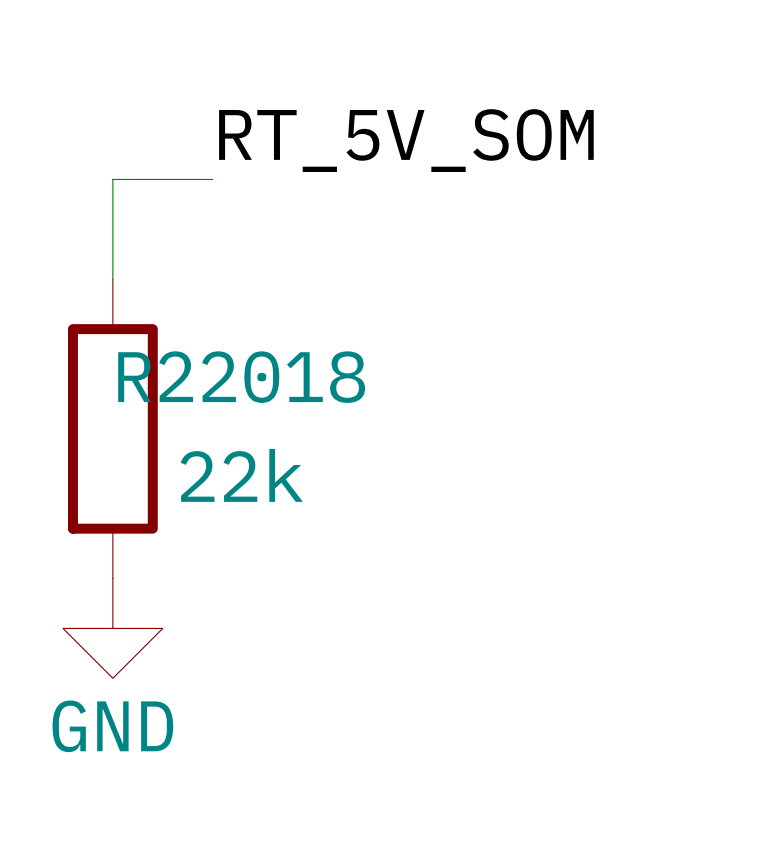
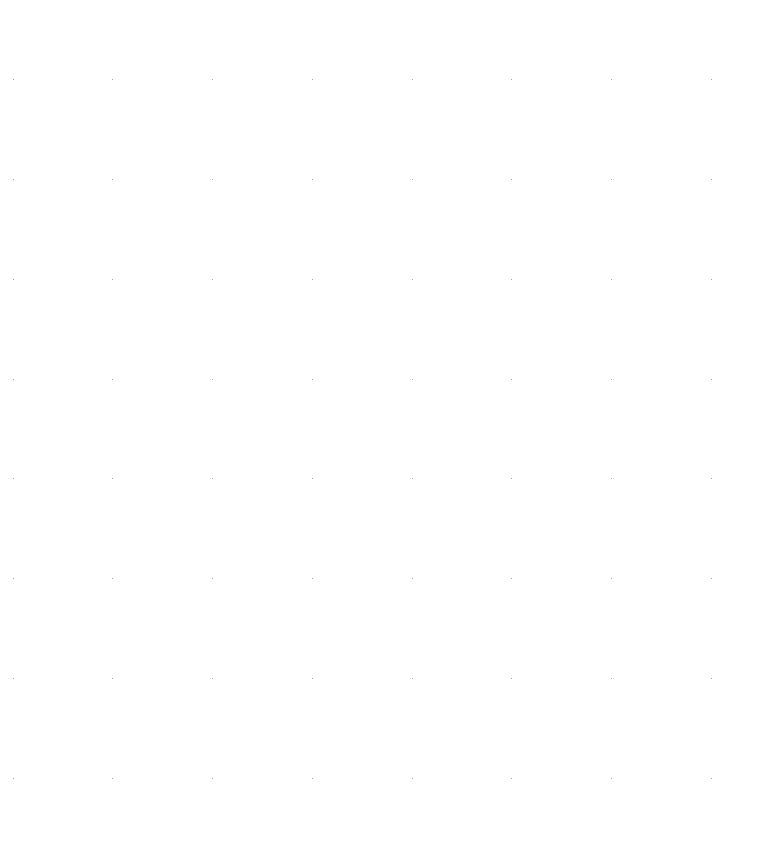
label: RT_5V_SOM (406, 140) -> none
wire: (212, 179) (112, 179) (112, 279) -> none
R22018: 22k (112, 428) -> none
power symbol: GND (112, 628) -> none

